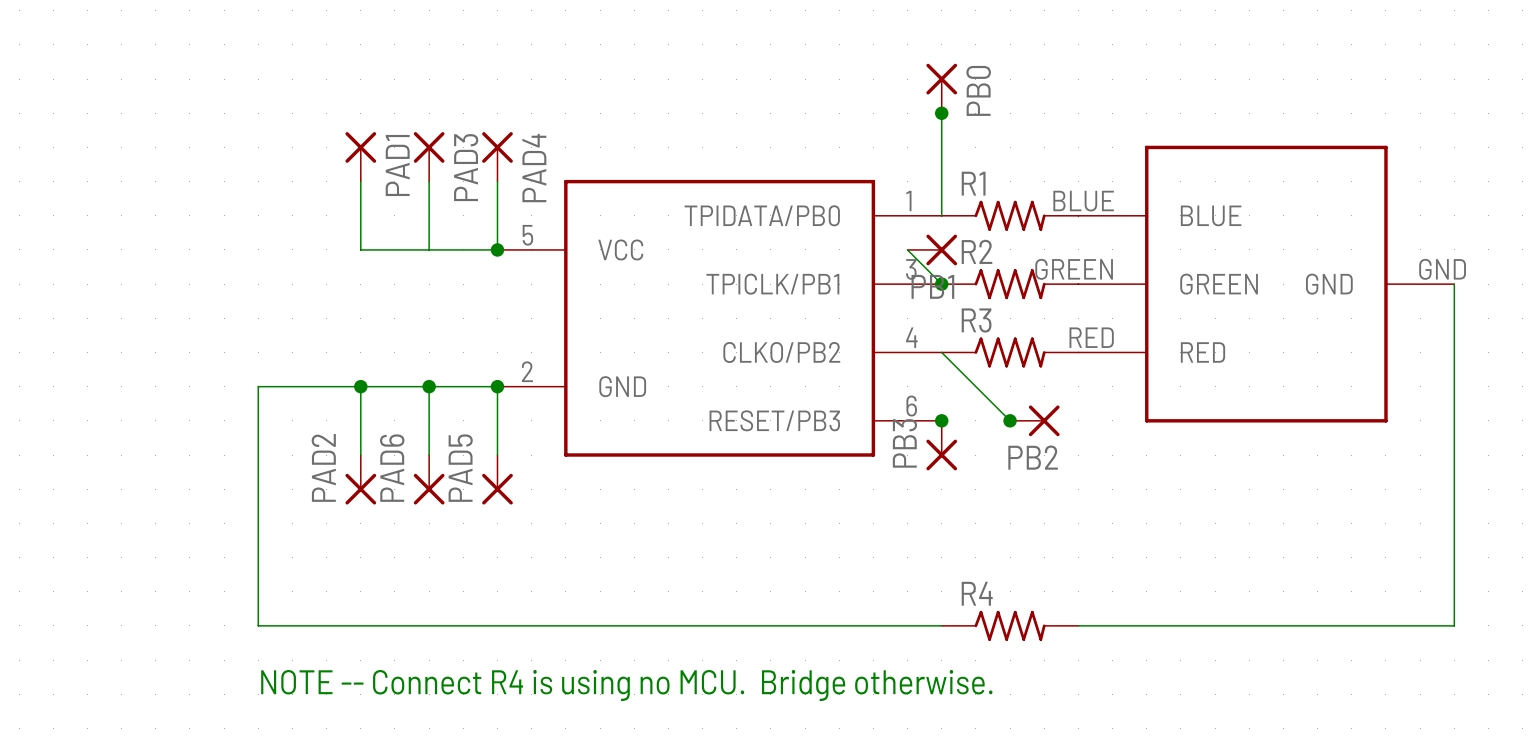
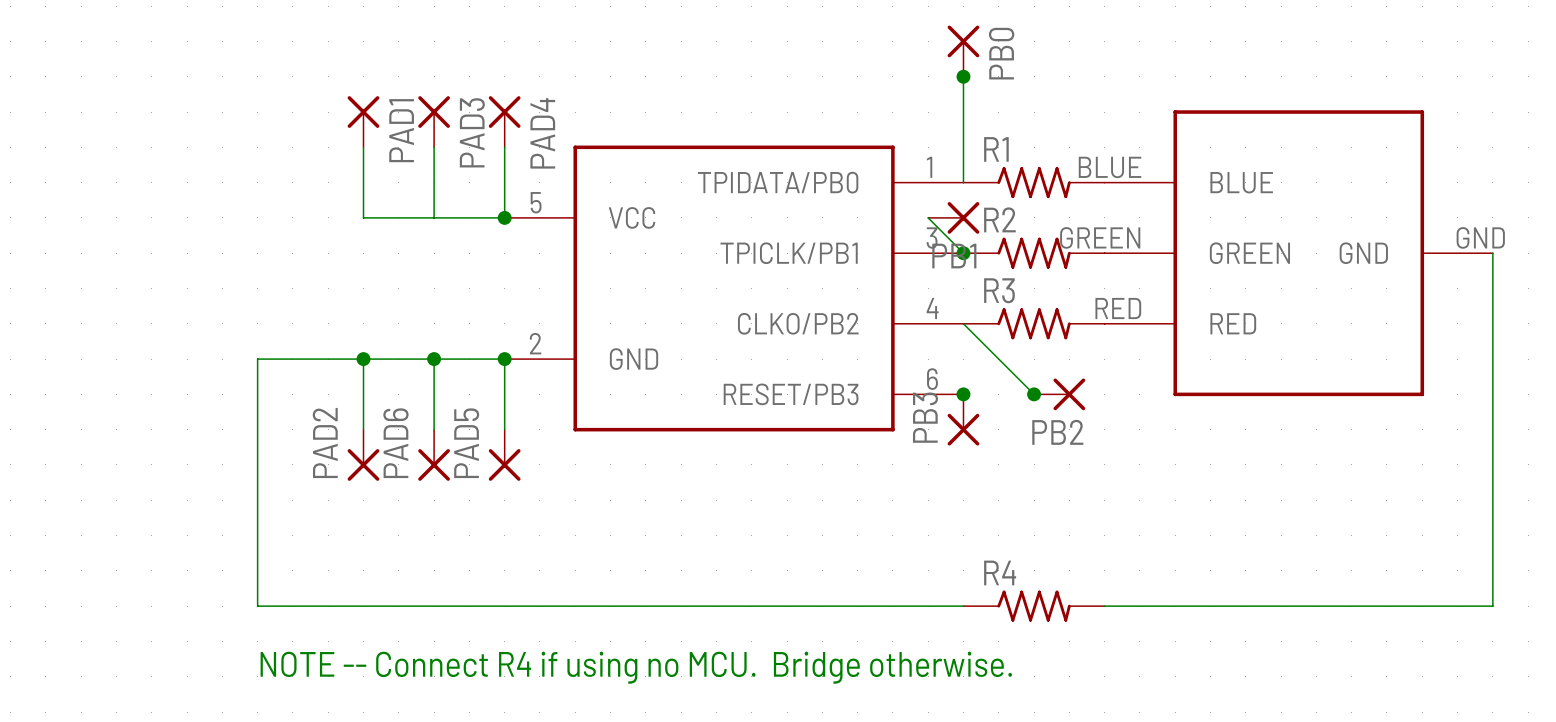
text: NOTE -- Connect R4 is using no MCU. Bridge otherwise. (626, 685) -> NOTE -- Connect R4 if using no MCU. Bridge otherwise. (636, 667)

